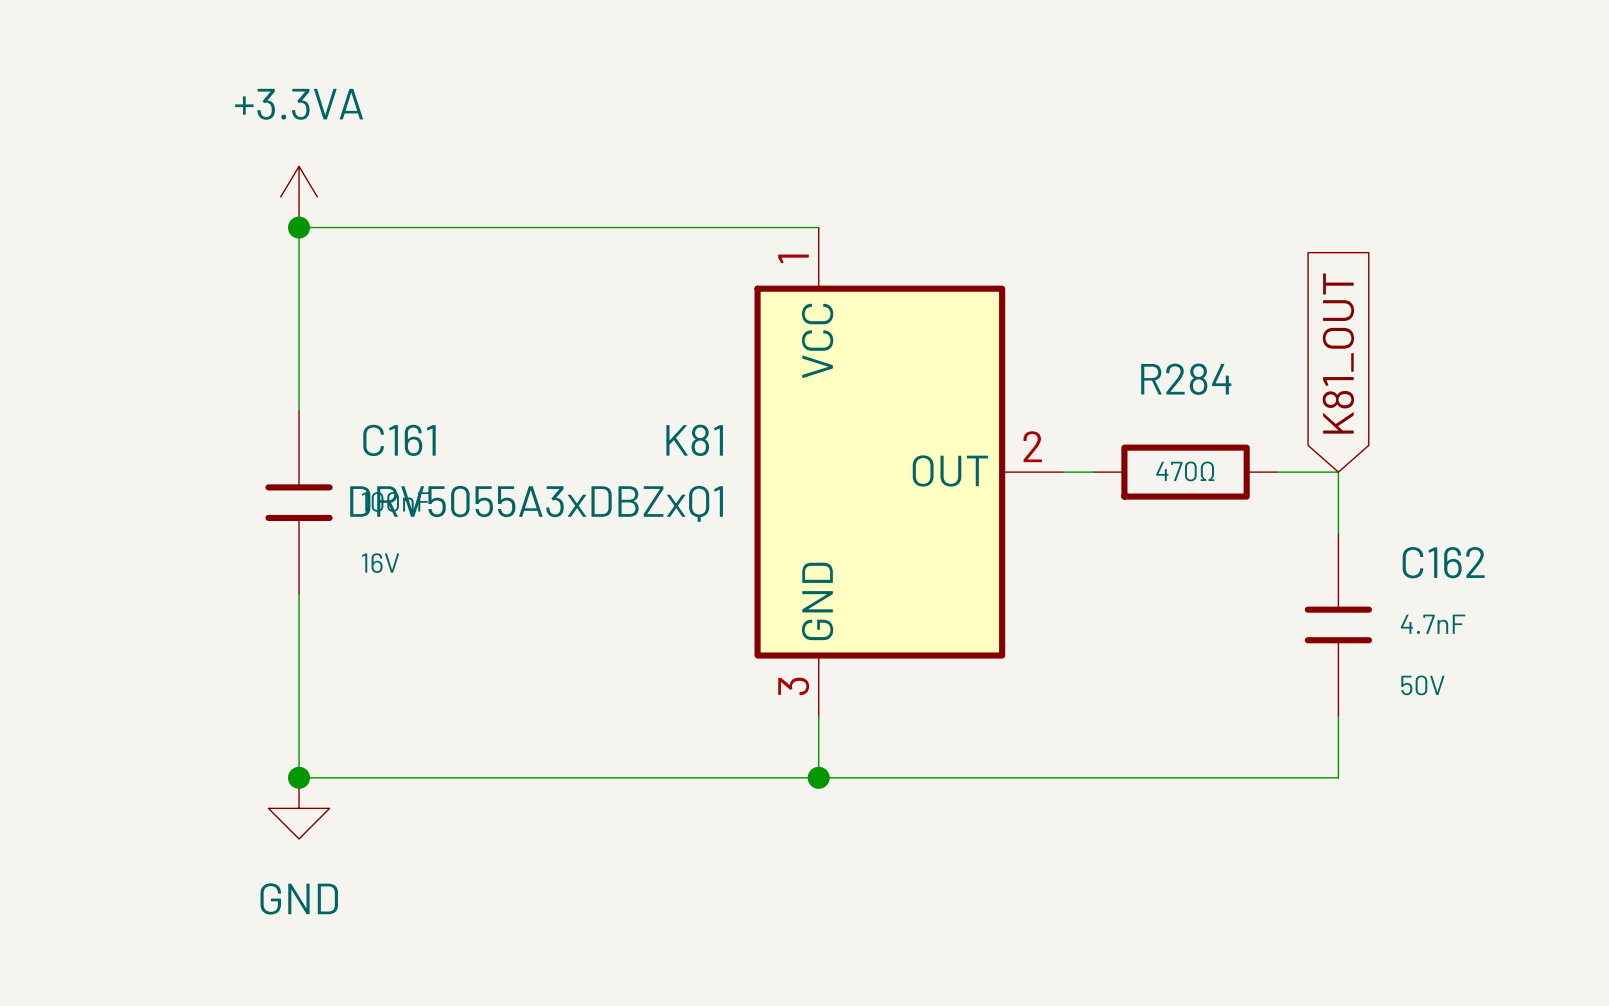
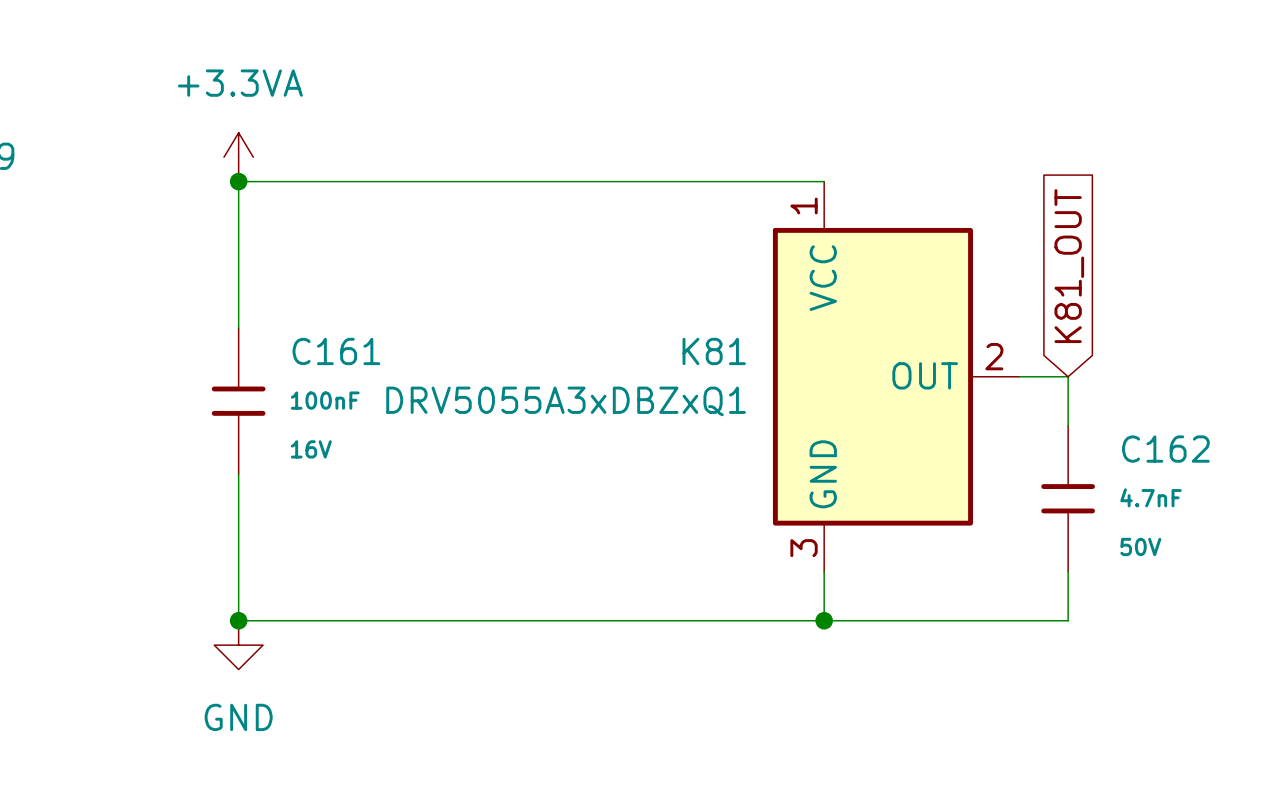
wire: none -> (653, 181) (824, 181)
K81 position: (908, 472) -> (896, 376)
R284: 470Ω (1185, 472) -> none
wire: (818, 716) (818, 777) -> (824, 571) (824, 620)
junction: (818, 777) -> none
junction: none -> (824, 620)

